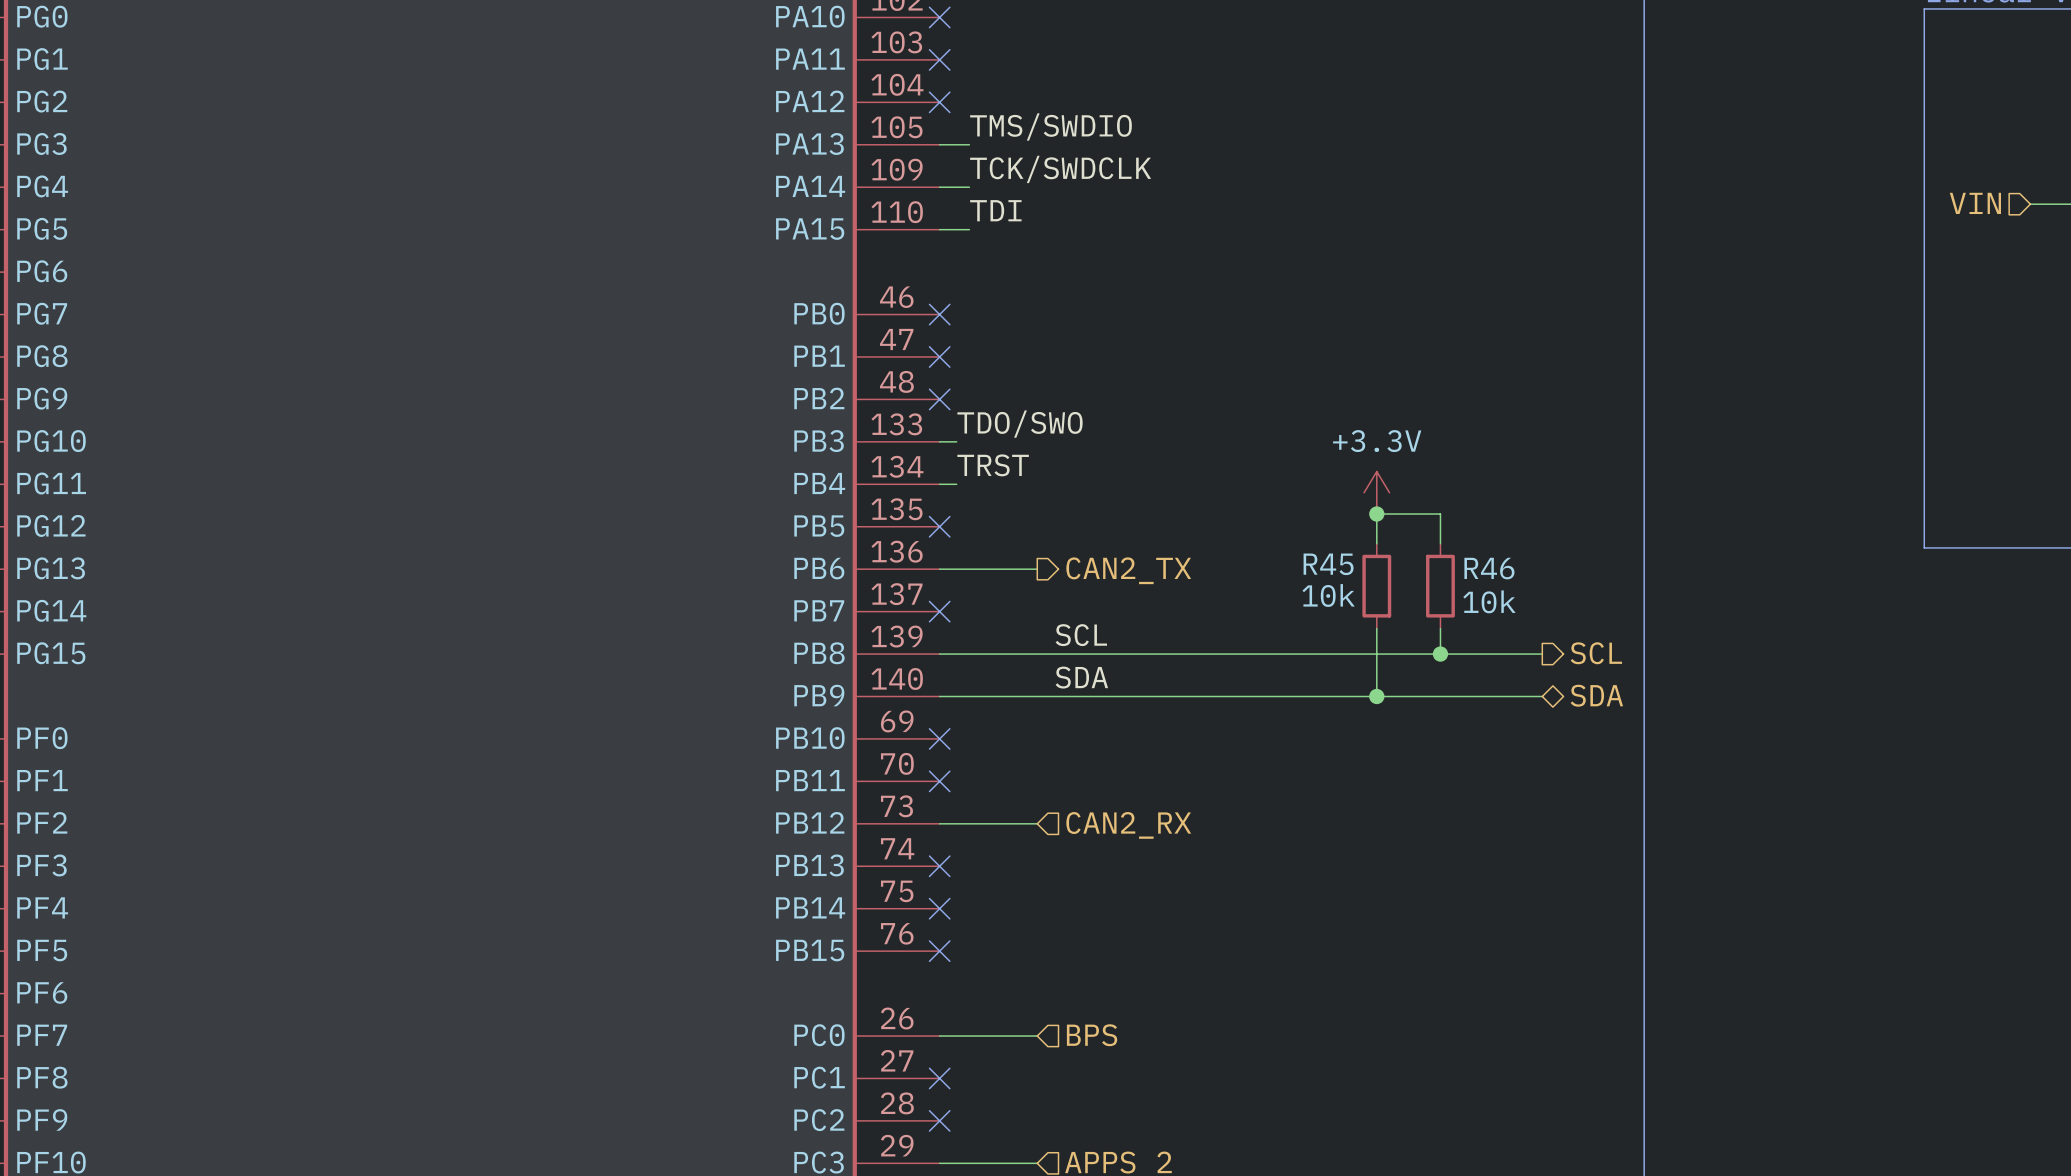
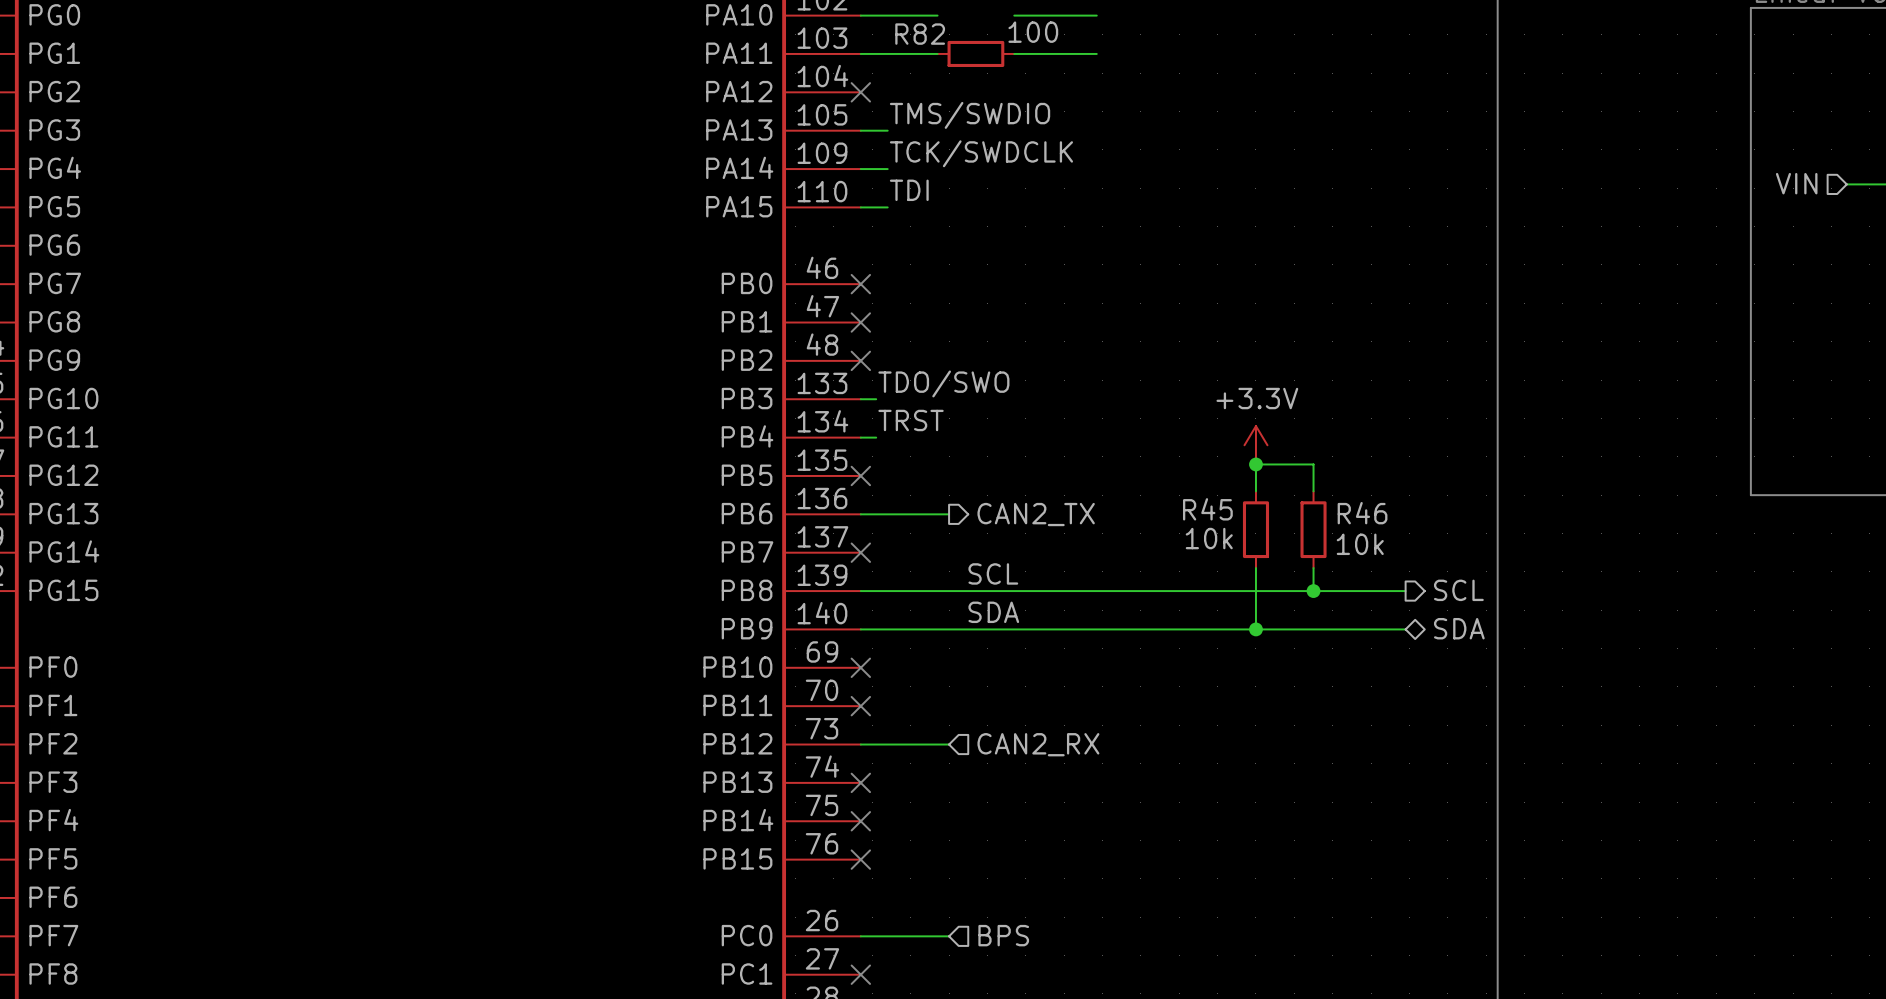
wire: none -> (860, 15) (937, 15)
no-connect mark: (939, 17) -> none
wire: none -> (1014, 15) (1096, 15)
wire: none -> (860, 53) (937, 53)
no-connect mark: (939, 59) -> none
R82: none -> 100 (975, 53)
wire: none -> (1014, 53) (1096, 53)

